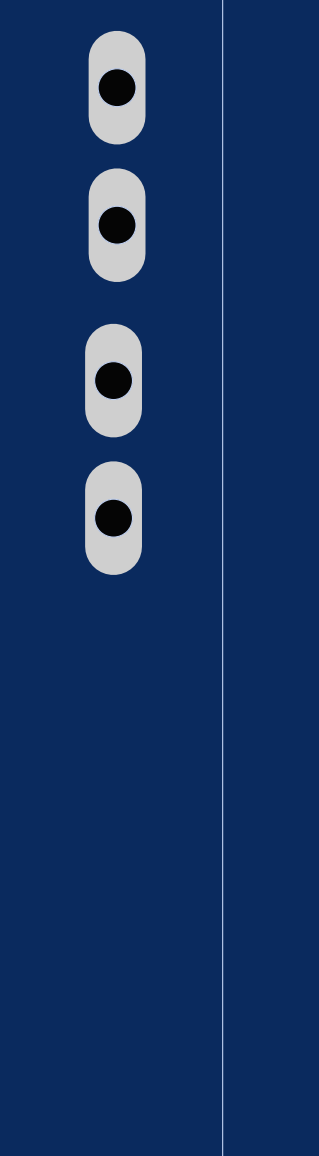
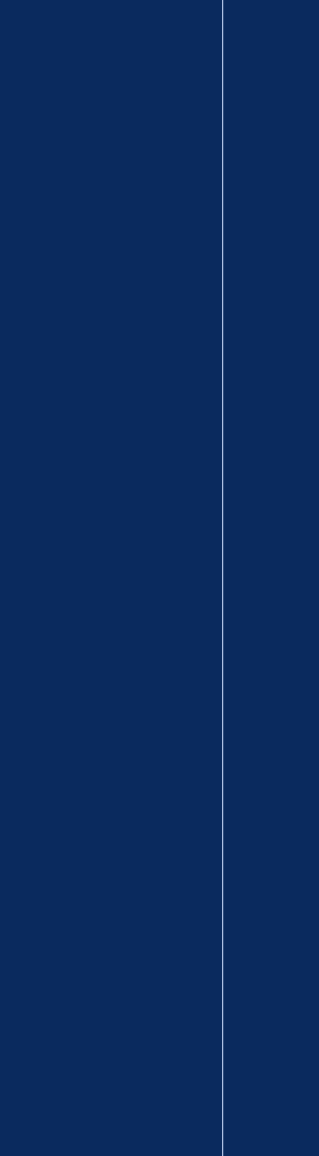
part: (117, 156) -> none
part: (113, 449) -> none

